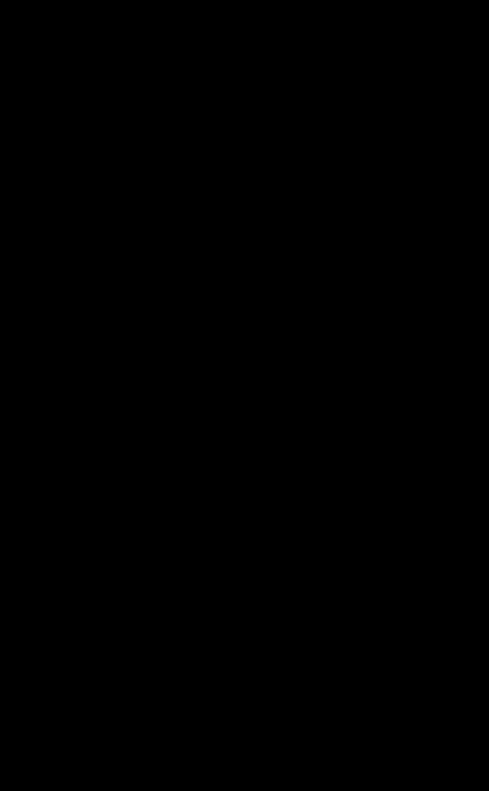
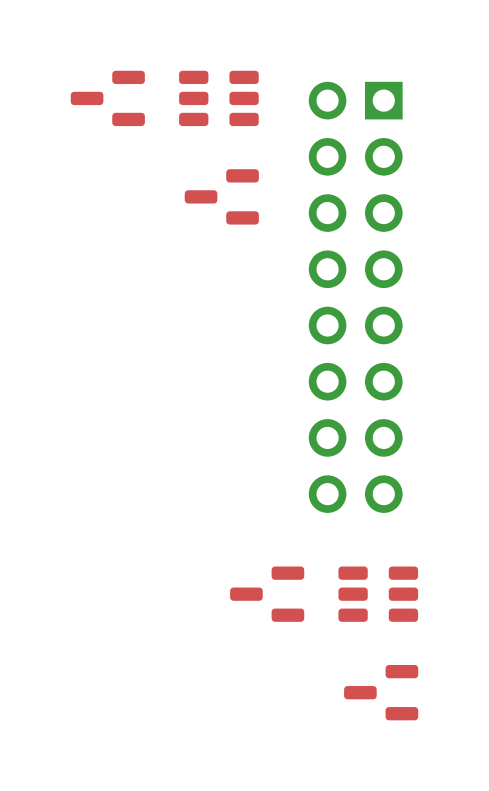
part: none -> (107, 98)
part: none -> (218, 98)
part: none -> (221, 196)
part: none -> (355, 297)
part: none -> (267, 594)
part: none -> (378, 594)
part: none -> (381, 692)

